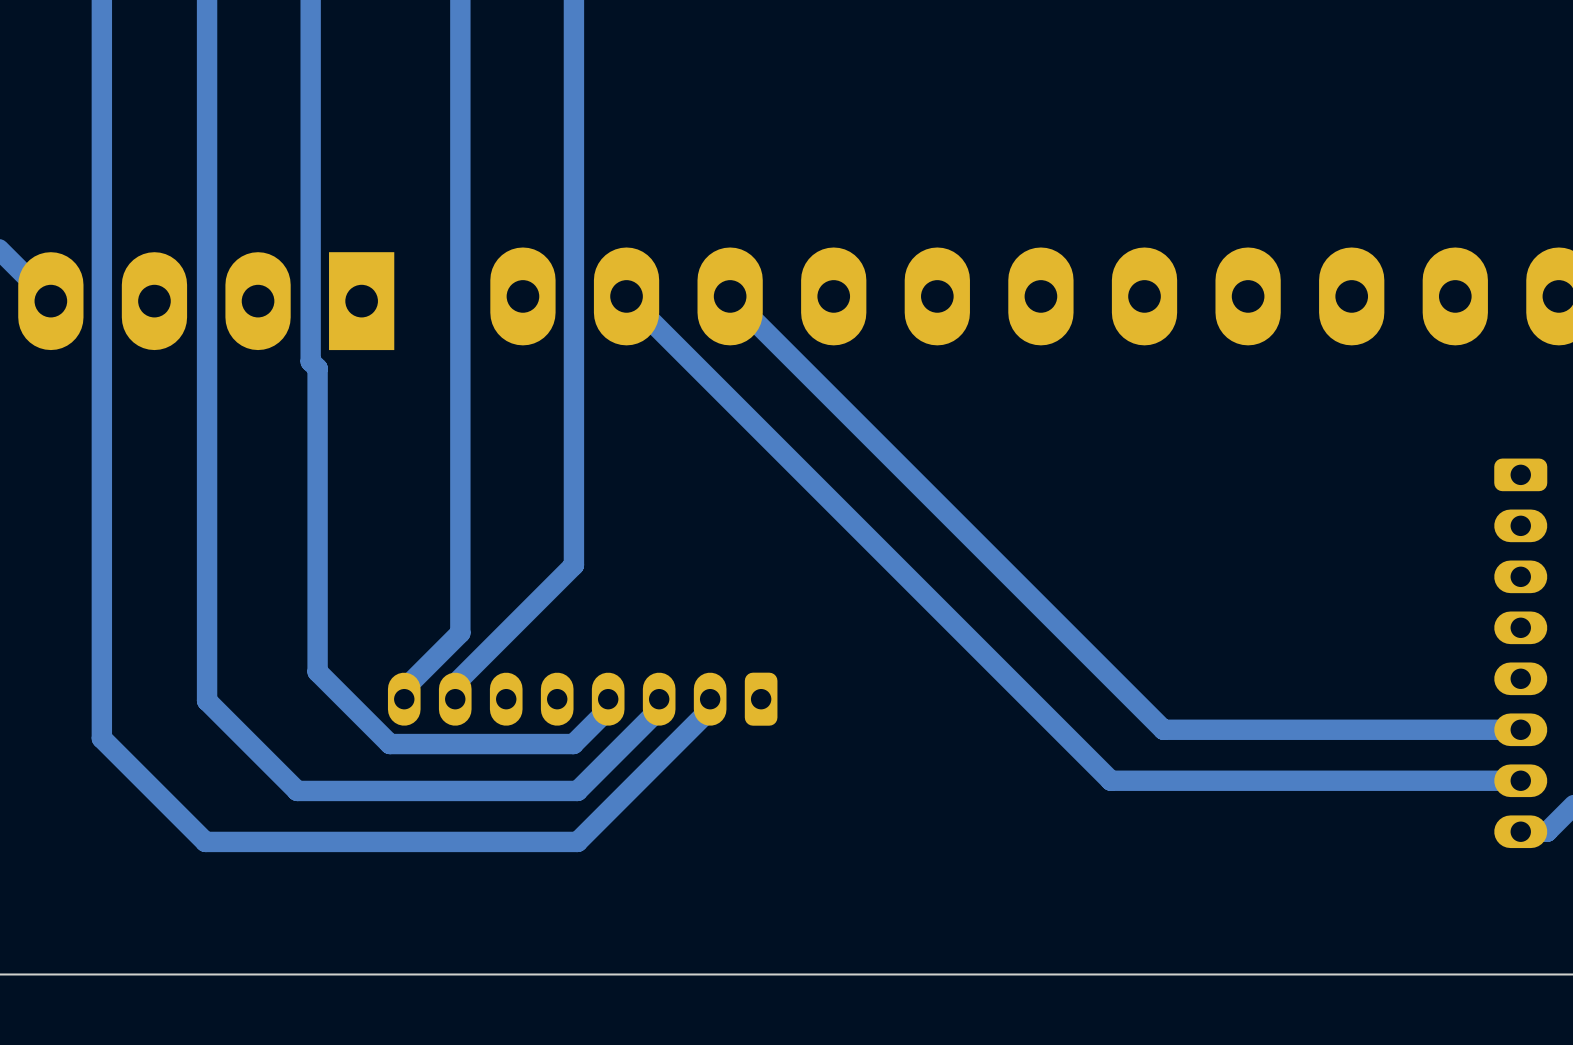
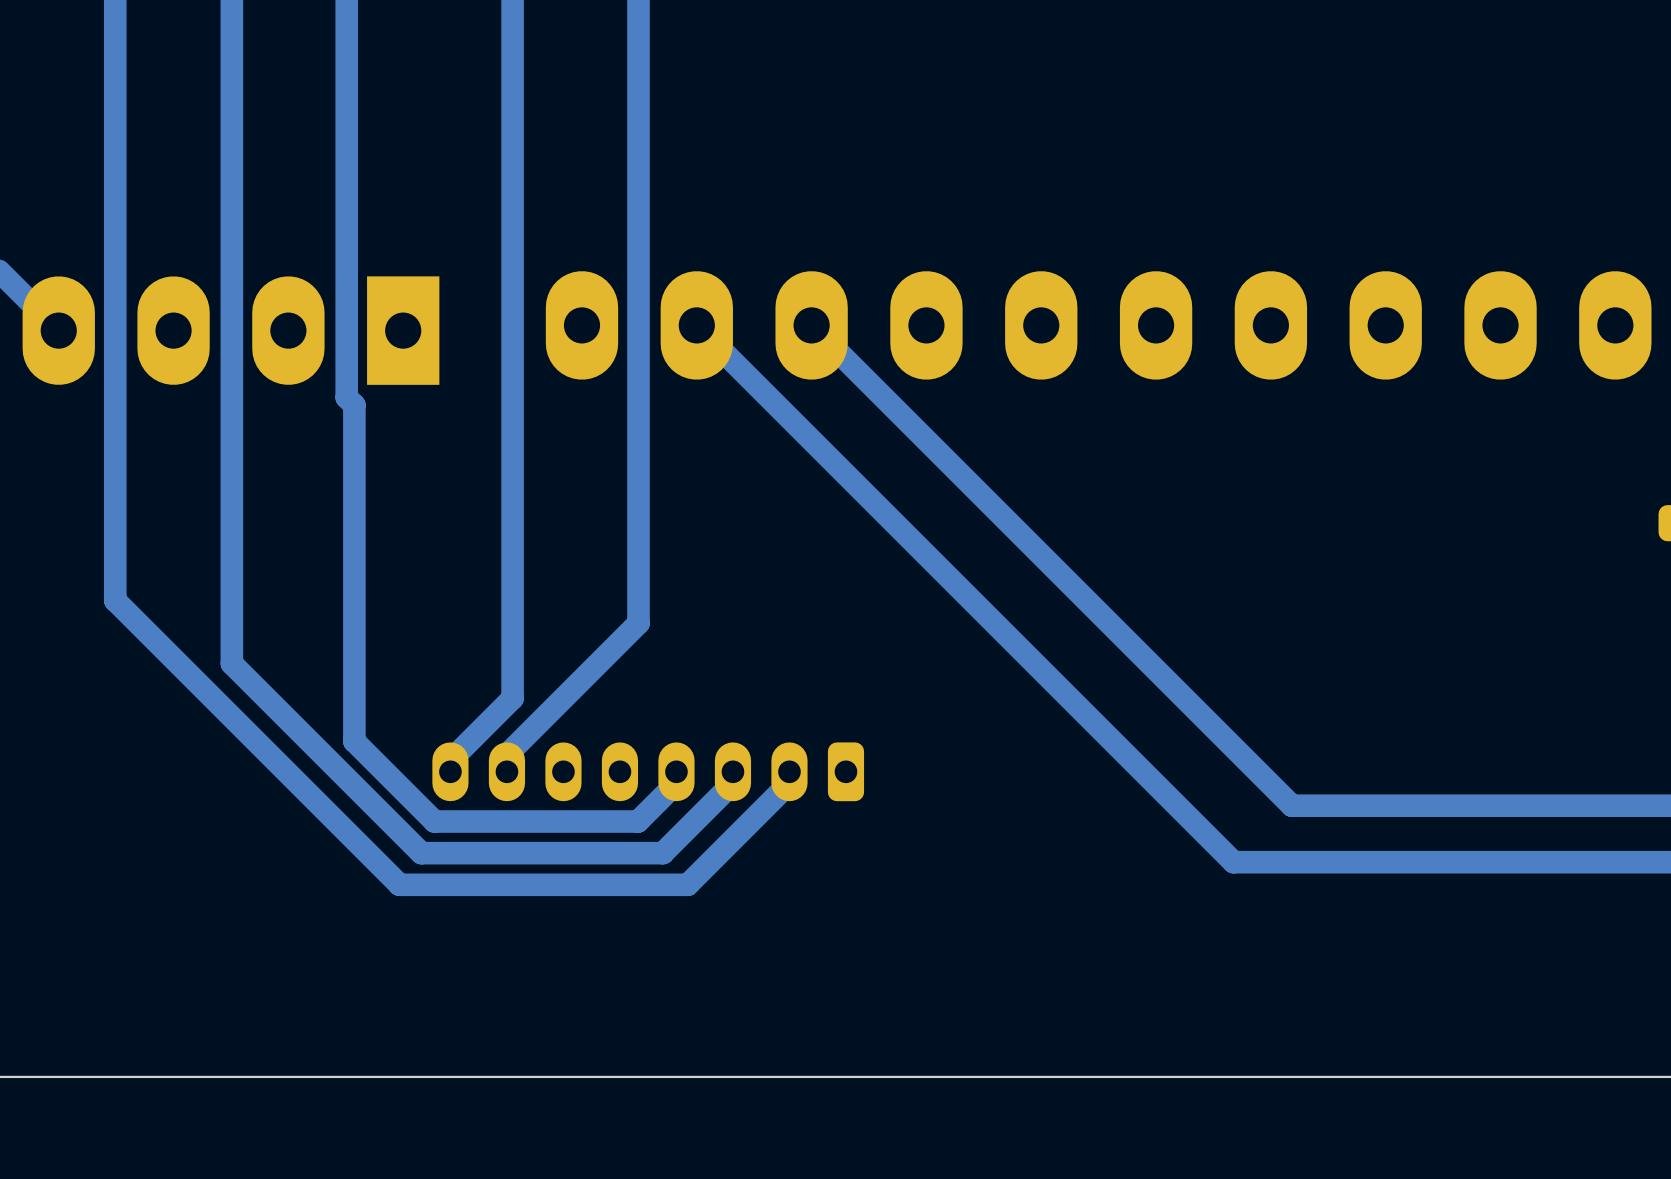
track: (101, 544) (101, 738) (205, 841) (577, 841) (618, 801) -> (115, 600) (399, 884) (687, 884)
track: (207, 601) (207, 700) (297, 790) (577, 790) (595, 772) -> (231, 663) (421, 853) (662, 853)

